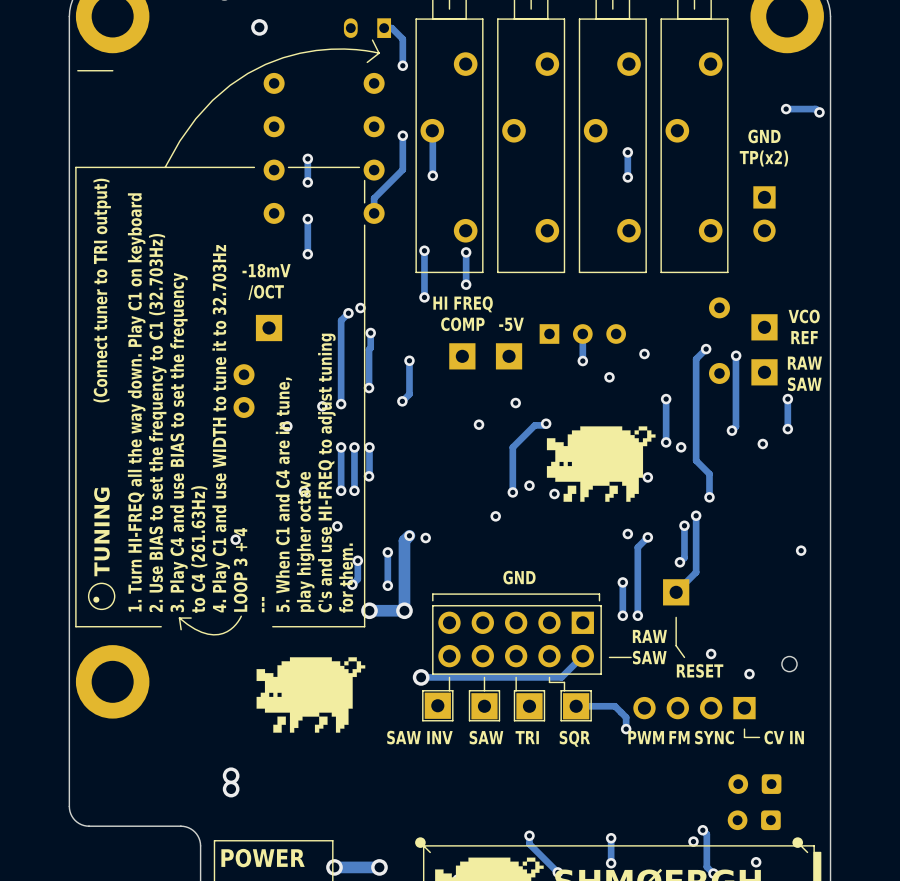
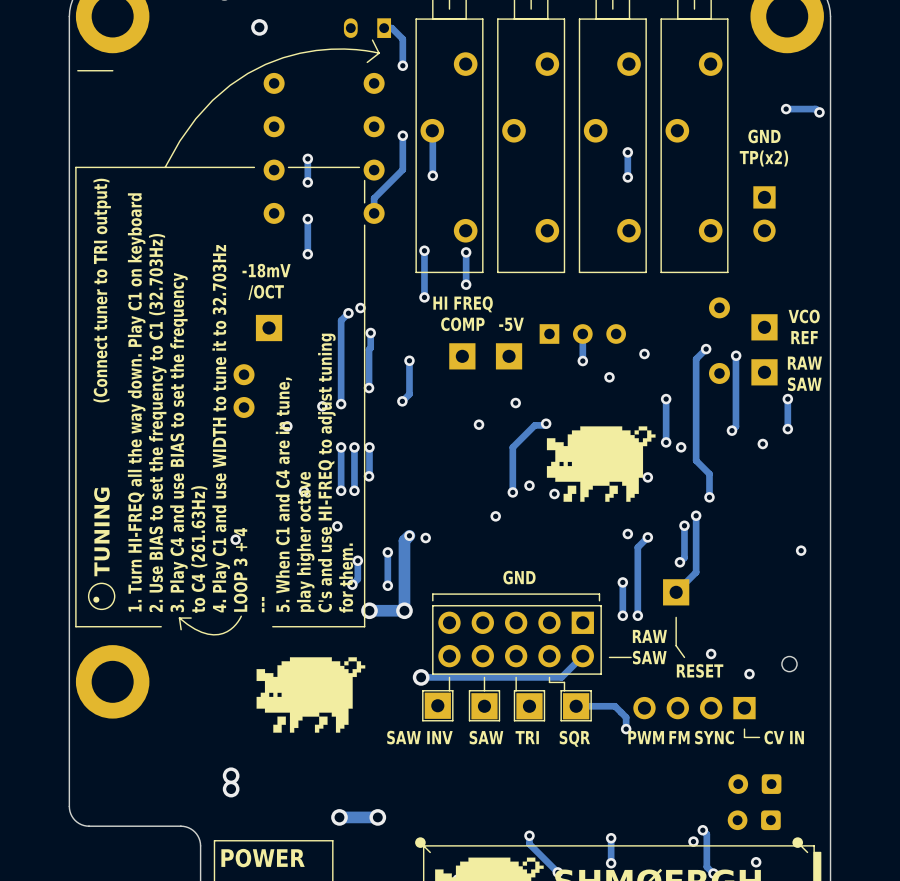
via: none -> (339, 817)
track: none -> (377, 817) (339, 817)
via: none -> (377, 817)
via: (334, 867) -> none
track: (379, 867) (334, 867) -> none
via: (379, 867) -> none

